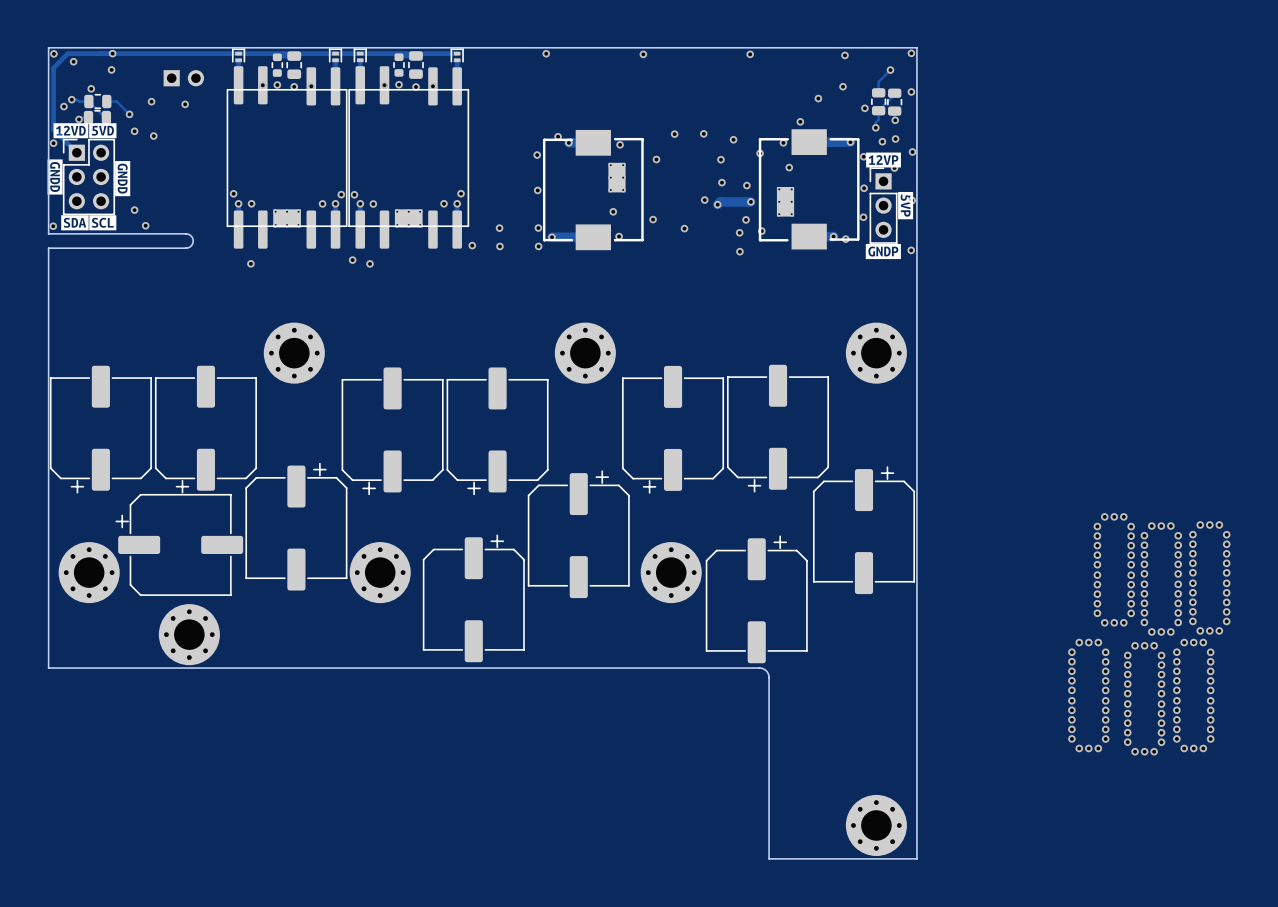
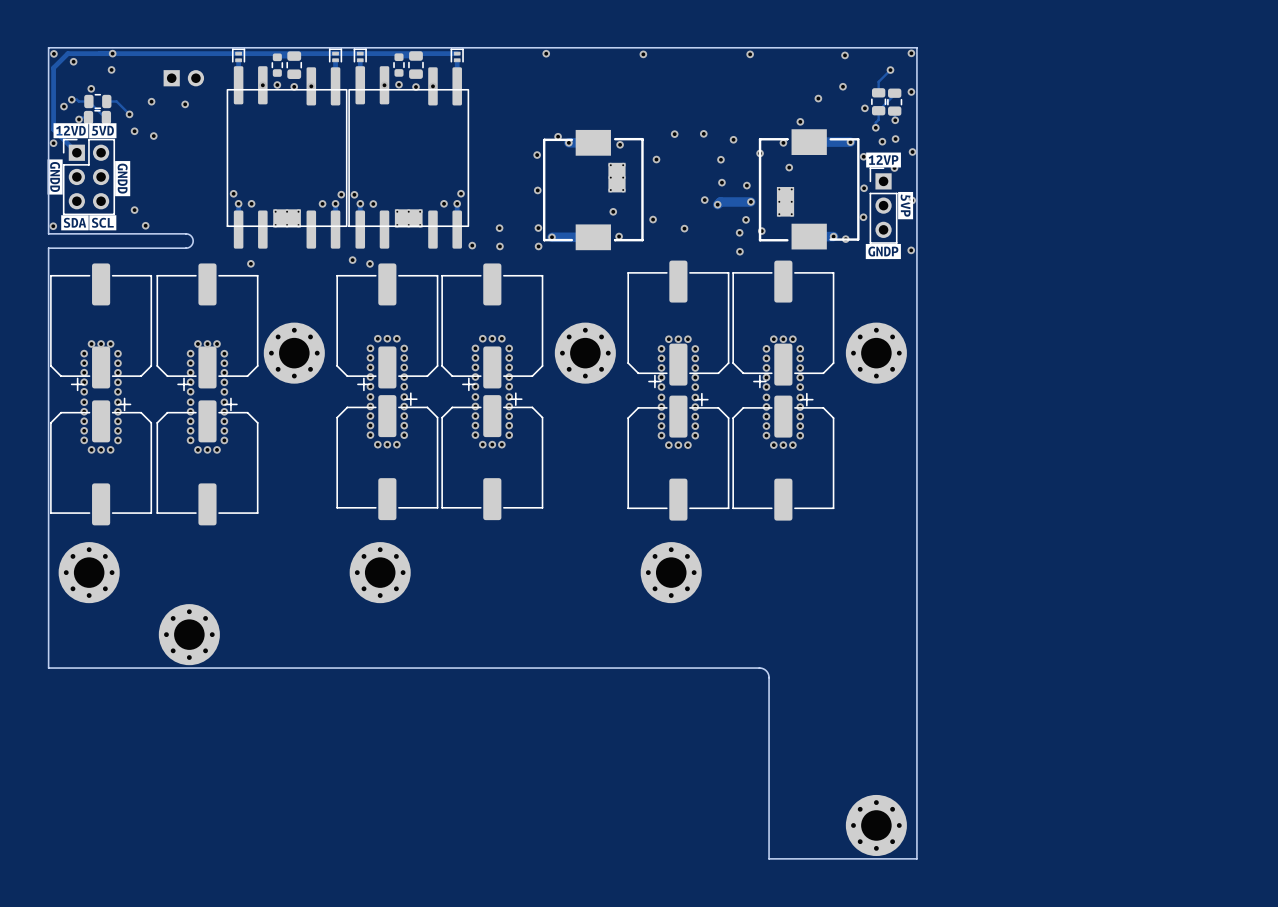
part: none -> (678, 324)
part: none -> (783, 324)
part: none -> (101, 327)
part: none -> (207, 327)
part: none -> (387, 327)
part: none -> (492, 327)
via: none -> (377, 338)
via: none -> (387, 338)
via: none -> (396, 338)
via: none -> (482, 338)
via: none -> (492, 338)
via: none -> (501, 338)
via: none -> (668, 339)
via: none -> (678, 339)
via: none -> (687, 339)
via: none -> (773, 339)
via: none -> (783, 339)
via: none -> (792, 339)
via: none -> (91, 343)
via: none -> (101, 343)
via: none -> (110, 343)
via: none -> (197, 343)
via: none -> (207, 343)
via: none -> (217, 343)
via: none -> (370, 348)
via: none -> (404, 348)
via: none -> (475, 348)
via: none -> (509, 348)
via: none -> (661, 348)
via: none -> (695, 348)
via: none -> (766, 348)
via: none -> (800, 348)
via: none -> (84, 353)
via: none -> (117, 353)
via: none -> (190, 353)
via: none -> (224, 353)
via: none -> (370, 357)
via: none -> (475, 357)
via: none -> (404, 358)
via: none -> (509, 358)
via: none -> (661, 358)
via: none -> (695, 358)
via: none -> (766, 358)
via: none -> (800, 358)
via: none -> (84, 363)
via: none -> (117, 363)
via: none -> (190, 363)
via: none -> (224, 363)
via: none -> (370, 367)
via: none -> (404, 367)
via: none -> (475, 367)
via: none -> (509, 367)
via: none -> (661, 367)
via: none -> (766, 367)
via: none -> (695, 368)
via: none -> (800, 368)
via: none -> (84, 372)
via: none -> (117, 372)
via: none -> (190, 372)
via: none -> (224, 372)
via: none -> (370, 376)
via: none -> (475, 376)
via: none -> (404, 377)
via: none -> (509, 377)
via: none -> (661, 377)
via: none -> (695, 377)
via: none -> (766, 377)
via: none -> (800, 377)
via: none -> (84, 382)
via: none -> (117, 382)
via: none -> (190, 382)
via: none -> (224, 382)
via: none -> (370, 386)
via: none -> (404, 386)
via: none -> (475, 386)
via: none -> (509, 386)
via: none -> (661, 387)
via: none -> (695, 387)
via: none -> (766, 387)
via: none -> (800, 387)
via: none -> (84, 391)
via: none -> (117, 391)
via: none -> (190, 391)
via: none -> (224, 391)
via: none -> (370, 396)
via: none -> (475, 396)
via: none -> (404, 397)
via: none -> (509, 397)
via: none -> (661, 397)
via: none -> (695, 397)
via: none -> (766, 397)
via: none -> (800, 397)
via: none -> (84, 402)
via: none -> (117, 402)
via: none -> (190, 402)
via: none -> (224, 402)
via: none -> (370, 406)
via: none -> (404, 406)
via: none -> (475, 406)
via: none -> (509, 406)
via: none -> (661, 406)
via: none -> (766, 406)
via: none -> (695, 407)
via: none -> (800, 407)
via: none -> (84, 411)
via: none -> (117, 411)
via: none -> (190, 411)
via: none -> (224, 411)
via: none -> (370, 416)
via: none -> (404, 416)
via: none -> (475, 416)
via: none -> (509, 416)
via: none -> (661, 416)
via: none -> (695, 416)
via: none -> (766, 416)
via: none -> (800, 416)
via: none -> (84, 421)
via: none -> (117, 421)
via: none -> (190, 421)
via: none -> (224, 421)
via: none -> (370, 425)
via: none -> (404, 425)
via: none -> (475, 425)
via: none -> (509, 425)
via: none -> (661, 426)
via: none -> (695, 426)
via: none -> (766, 426)
via: none -> (800, 426)
part rotation: 0° (778, 428) -> 180° (783, 456)
part rotation: 0° (100, 429) -> 180° (101, 461)
part rotation: 0° (205, 429) -> 180° (207, 461)
part rotation: 0° (673, 429) -> 180° (678, 456)
via: none -> (84, 430)
via: none -> (117, 430)
via: none -> (190, 430)
via: none -> (224, 430)
part rotation: 0° (392, 431) -> 180° (387, 456)
part rotation: 0° (497, 431) -> 180° (492, 456)
via: none -> (370, 435)
via: none -> (404, 435)
via: none -> (475, 435)
via: none -> (509, 435)
via: none -> (661, 435)
via: none -> (695, 435)
via: none -> (766, 435)
via: none -> (800, 435)
via: none -> (84, 440)
via: none -> (117, 440)
via: none -> (190, 440)
via: none -> (224, 440)
via: none -> (377, 444)
via: none -> (387, 444)
via: none -> (396, 444)
via: none -> (482, 444)
via: none -> (492, 444)
via: none -> (501, 444)
via: none -> (668, 445)
via: none -> (678, 445)
via: none -> (687, 445)
via: none -> (773, 445)
via: none -> (783, 445)
via: none -> (792, 445)
via: none -> (91, 449)
via: none -> (101, 449)
via: none -> (110, 449)
via: none -> (197, 449)
via: none -> (207, 449)
via: none -> (217, 449)
via: (1104, 516) -> none
via: (1114, 516) -> none
via: (1123, 516) -> none
via: (1200, 524) -> none
via: (1209, 524) -> none
via: (1219, 524) -> none
part: (296, 526) -> none
via: (1097, 526) -> none
via: (1131, 526) -> none
via: (1151, 526) -> none
via: (1161, 526) -> none
via: (1170, 526) -> none
part: (863, 530) -> none
part: (578, 534) -> none
via: (1192, 534) -> none
via: (1226, 534) -> none
via: (1144, 535) -> none
via: (1178, 535) -> none
via: (1097, 536) -> none
via: (1131, 536) -> none
part: (179, 544) -> none
via: (1192, 544) -> none
via: (1226, 544) -> none
via: (1097, 545) -> none
via: (1131, 545) -> none
via: (1144, 545) -> none
via: (1178, 545) -> none
via: (1192, 553) -> none
via: (1226, 553) -> none
via: (1144, 554) -> none
via: (1178, 554) -> none
via: (1097, 555) -> none
via: (1131, 555) -> none
via: (1192, 563) -> none
via: (1226, 563) -> none
via: (1097, 564) -> none
via: (1131, 564) -> none
via: (1144, 564) -> none
via: (1178, 564) -> none
via: (1192, 572) -> none
via: (1226, 572) -> none
via: (1144, 573) -> none
via: (1178, 573) -> none
via: (1097, 575) -> none
via: (1131, 575) -> none
via: (1192, 583) -> none
via: (1226, 583) -> none
via: (1097, 584) -> none
via: (1131, 584) -> none
via: (1144, 584) -> none
via: (1178, 584) -> none
via: (1192, 592) -> none
via: (1226, 592) -> none
via: (1144, 593) -> none
via: (1178, 593) -> none
via: (1097, 594) -> none
via: (1131, 594) -> none
part: (473, 598) -> none
part: (756, 599) -> none
via: (1192, 602) -> none
via: (1226, 602) -> none
via: (1097, 603) -> none
via: (1131, 603) -> none
via: (1144, 603) -> none
via: (1178, 603) -> none
via: (1192, 611) -> none
via: (1226, 611) -> none
via: (1144, 612) -> none
via: (1178, 612) -> none
via: (1097, 613) -> none
via: (1131, 613) -> none
via: (1192, 621) -> none
via: (1226, 621) -> none
via: (1104, 622) -> none
via: (1114, 622) -> none
via: (1123, 622) -> none
via: (1144, 622) -> none
via: (1178, 622) -> none
via: (1200, 630) -> none
via: (1209, 630) -> none
via: (1219, 630) -> none
via: (1151, 631) -> none
via: (1161, 631) -> none
via: (1170, 631) -> none
via: (1079, 642) -> none
via: (1088, 642) -> none
via: (1098, 642) -> none
via: (1184, 642) -> none
via: (1193, 642) -> none
via: (1203, 642) -> none
via: (1135, 645) -> none
via: (1144, 645) -> none
via: (1154, 645) -> none
via: (1071, 652) -> none
via: (1105, 652) -> none
via: (1176, 652) -> none
via: (1210, 652) -> none
via: (1127, 655) -> none
via: (1161, 655) -> none
via: (1071, 661) -> none
via: (1105, 661) -> none
via: (1176, 661) -> none
via: (1210, 661) -> none
via: (1127, 664) -> none
via: (1161, 665) -> none
via: (1071, 671) -> none
via: (1105, 671) -> none
via: (1176, 671) -> none
via: (1210, 671) -> none
via: (1127, 674) -> none
via: (1161, 674) -> none
via: (1071, 680) -> none
via: (1105, 680) -> none
via: (1176, 680) -> none
via: (1210, 680) -> none
via: (1127, 684) -> none
via: (1161, 684) -> none
via: (1071, 690) -> none
via: (1105, 690) -> none
via: (1176, 690) -> none
via: (1210, 690) -> none
via: (1127, 693) -> none
via: (1161, 693) -> none
via: (1071, 700) -> none
via: (1105, 700) -> none
via: (1176, 700) -> none
via: (1210, 700) -> none
via: (1127, 704) -> none
via: (1161, 704) -> none
via: (1071, 710) -> none
via: (1105, 710) -> none
via: (1176, 710) -> none
via: (1210, 710) -> none
via: (1127, 713) -> none
via: (1161, 713) -> none
via: (1071, 719) -> none
via: (1105, 719) -> none
via: (1176, 719) -> none
via: (1210, 719) -> none
via: (1127, 723) -> none
via: (1161, 723) -> none
via: (1071, 729) -> none
via: (1105, 729) -> none
via: (1176, 729) -> none
via: (1210, 729) -> none
via: (1127, 732) -> none
via: (1161, 732) -> none
via: (1071, 738) -> none
via: (1176, 738) -> none
via: (1105, 739) -> none
via: (1210, 739) -> none
via: (1127, 742) -> none
via: (1161, 742) -> none
via: (1079, 748) -> none
via: (1088, 748) -> none
via: (1098, 748) -> none
via: (1184, 748) -> none
via: (1193, 748) -> none
via: (1203, 748) -> none
via: (1135, 751) -> none
via: (1144, 751) -> none
via: (1154, 751) -> none

